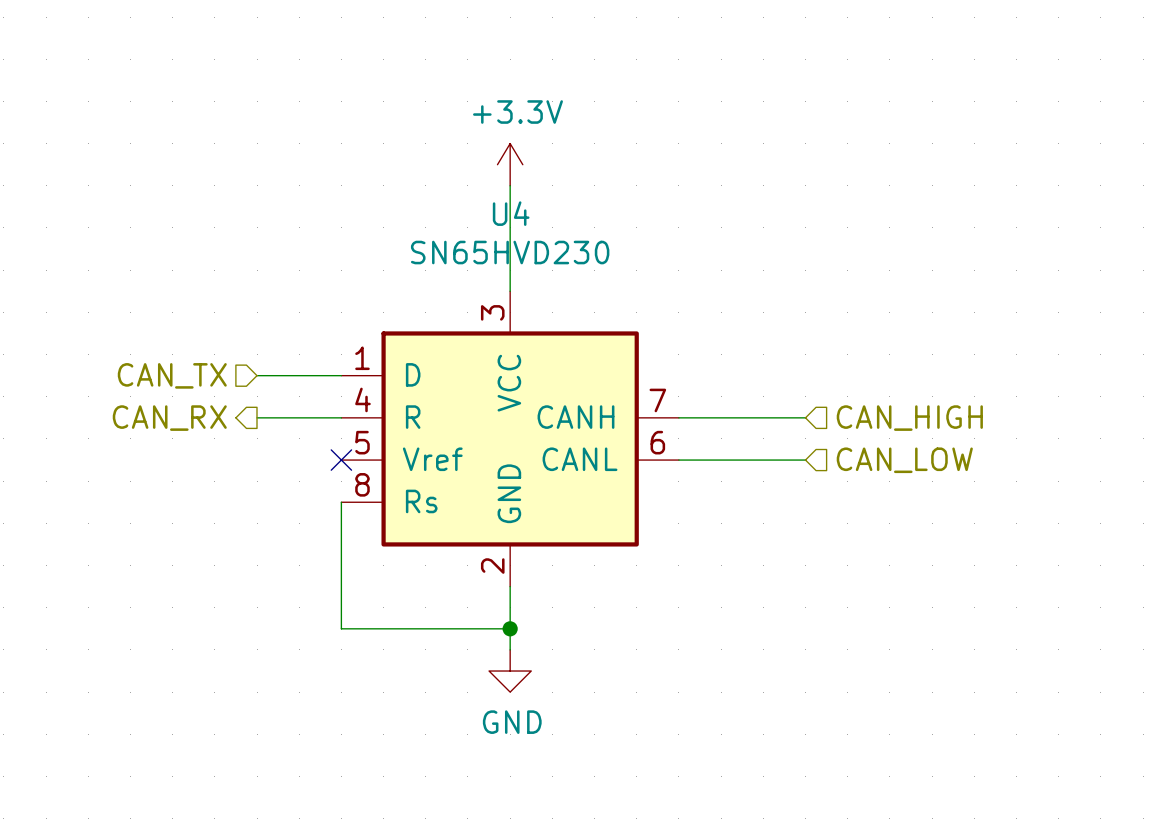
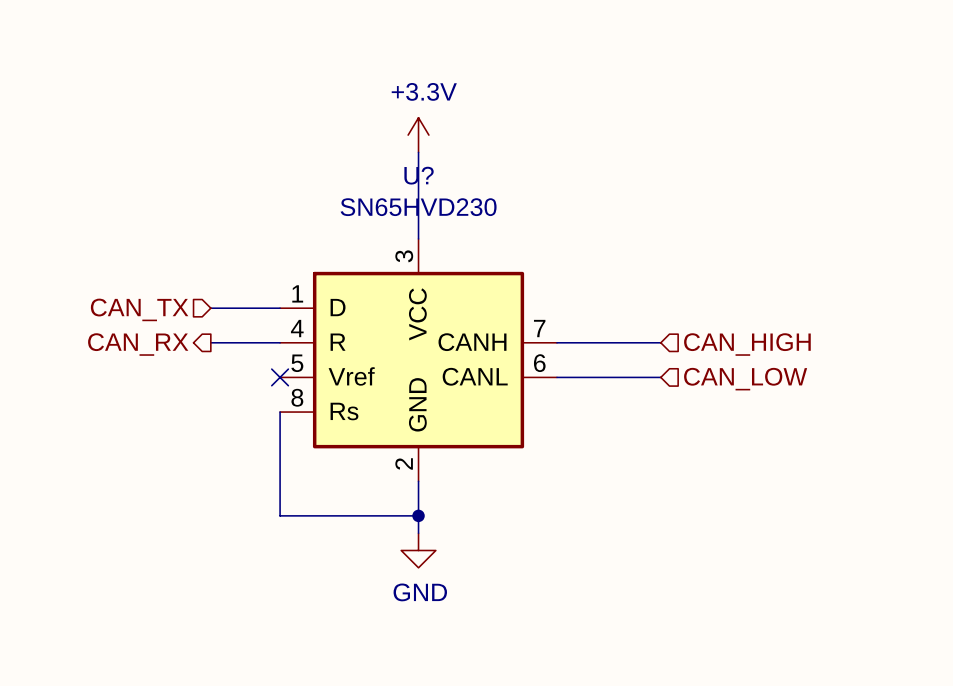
U4 name: U4 (511, 213) -> U? (419, 175)

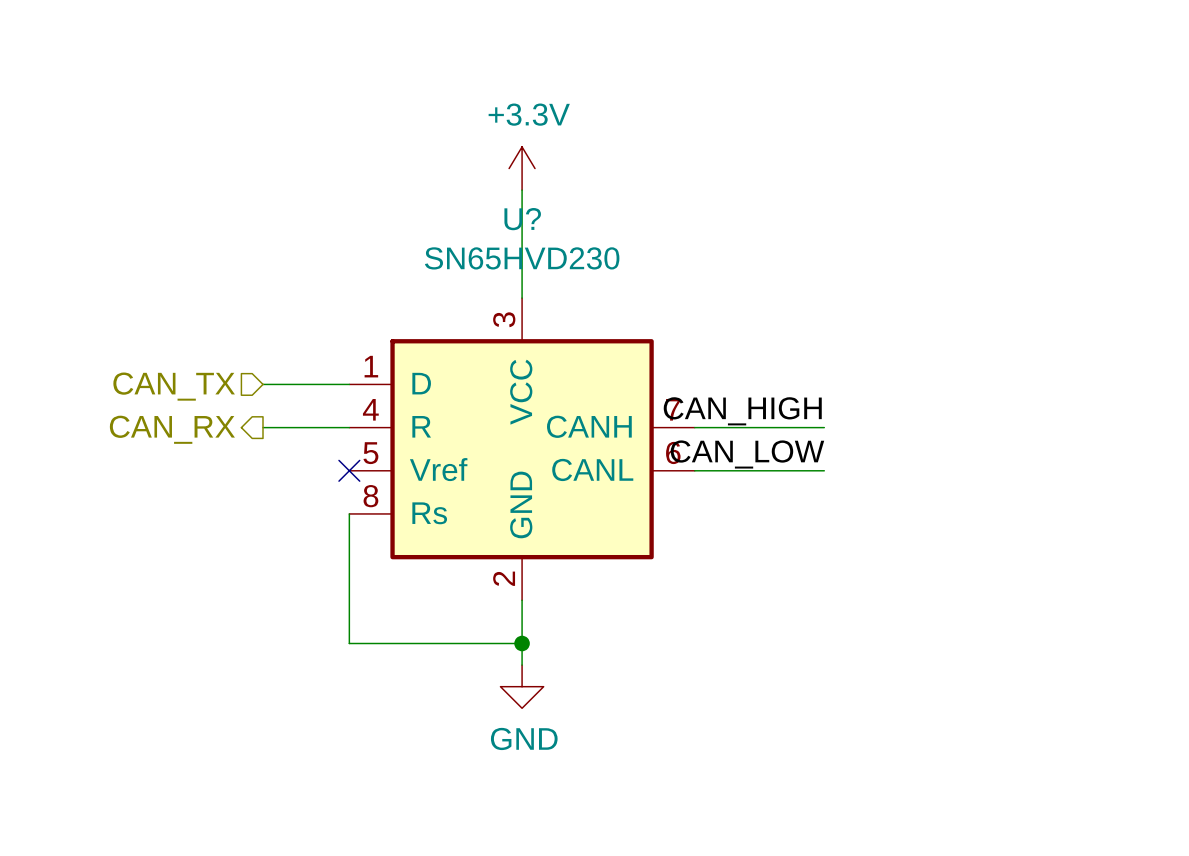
label: none -> CAN_HIGH (742, 411)
hierarchical label: CAN_HIGH (747, 344) -> none
label: none -> CAN_LOW (747, 454)
hierarchical label: CAN_LOW (745, 379) -> none

